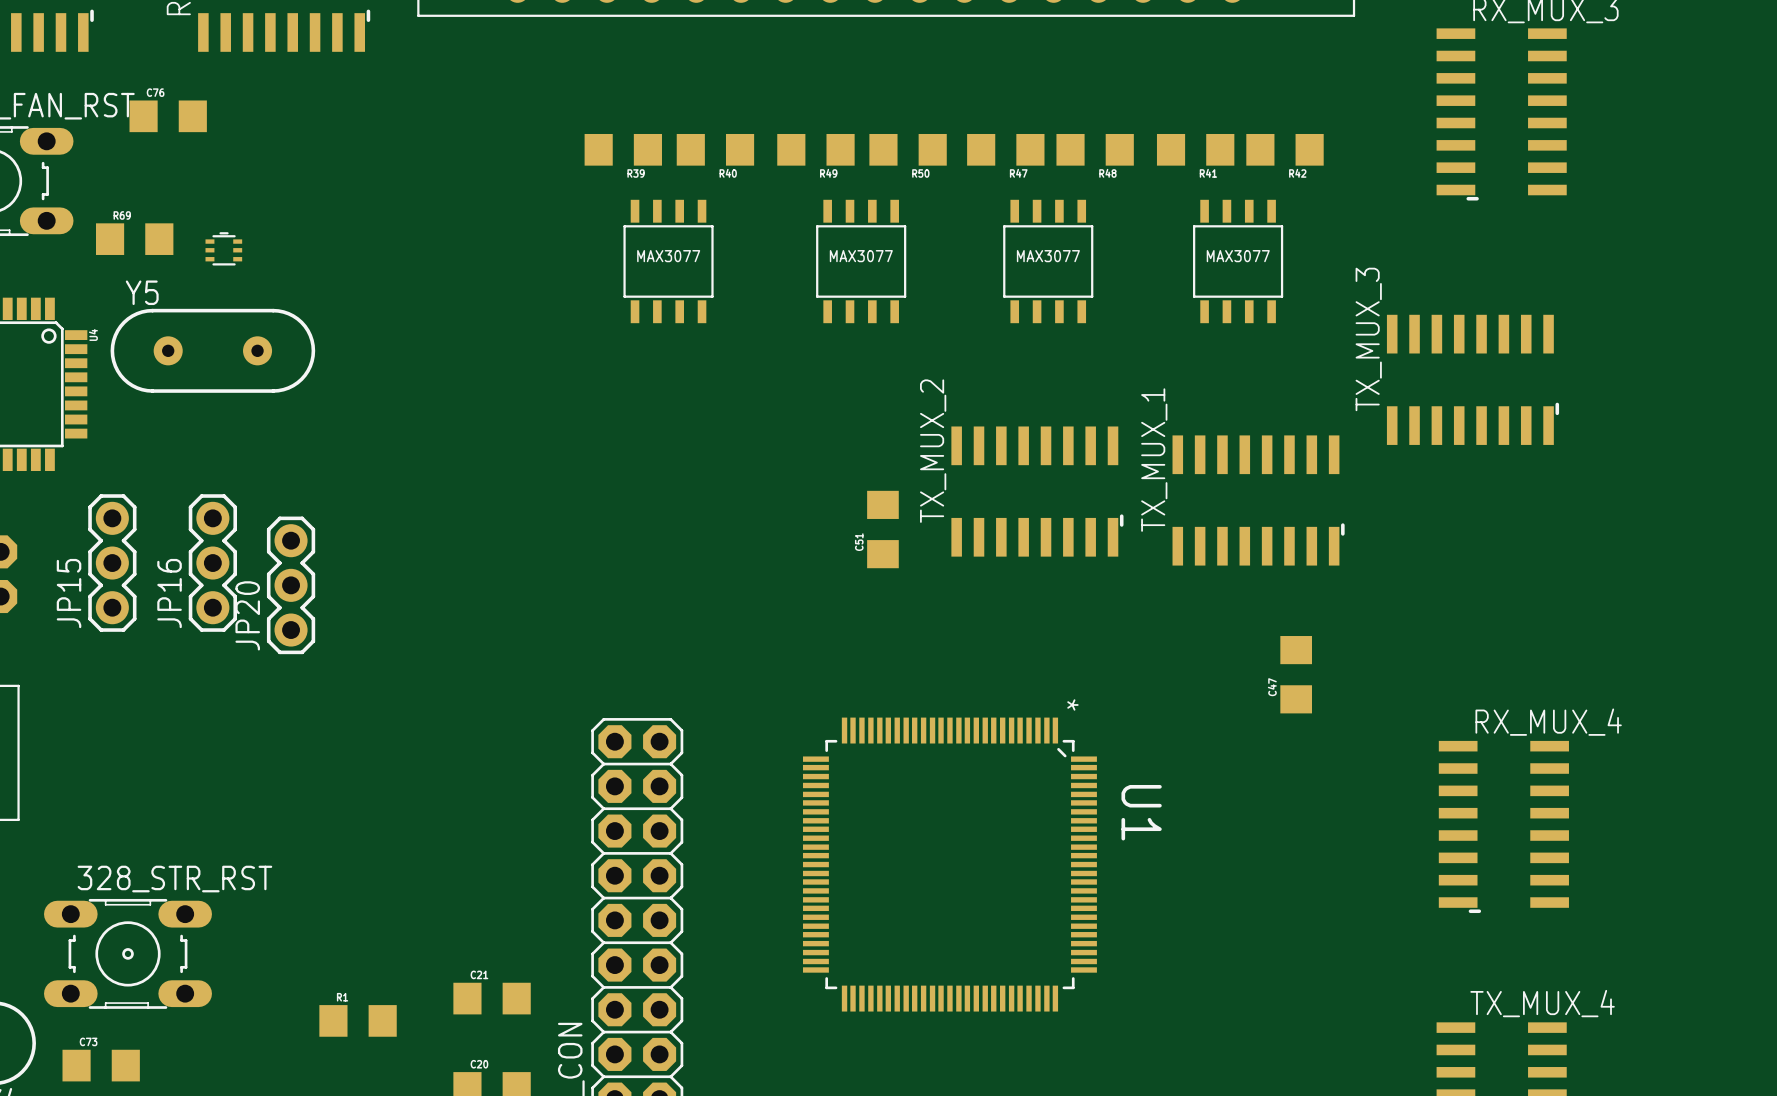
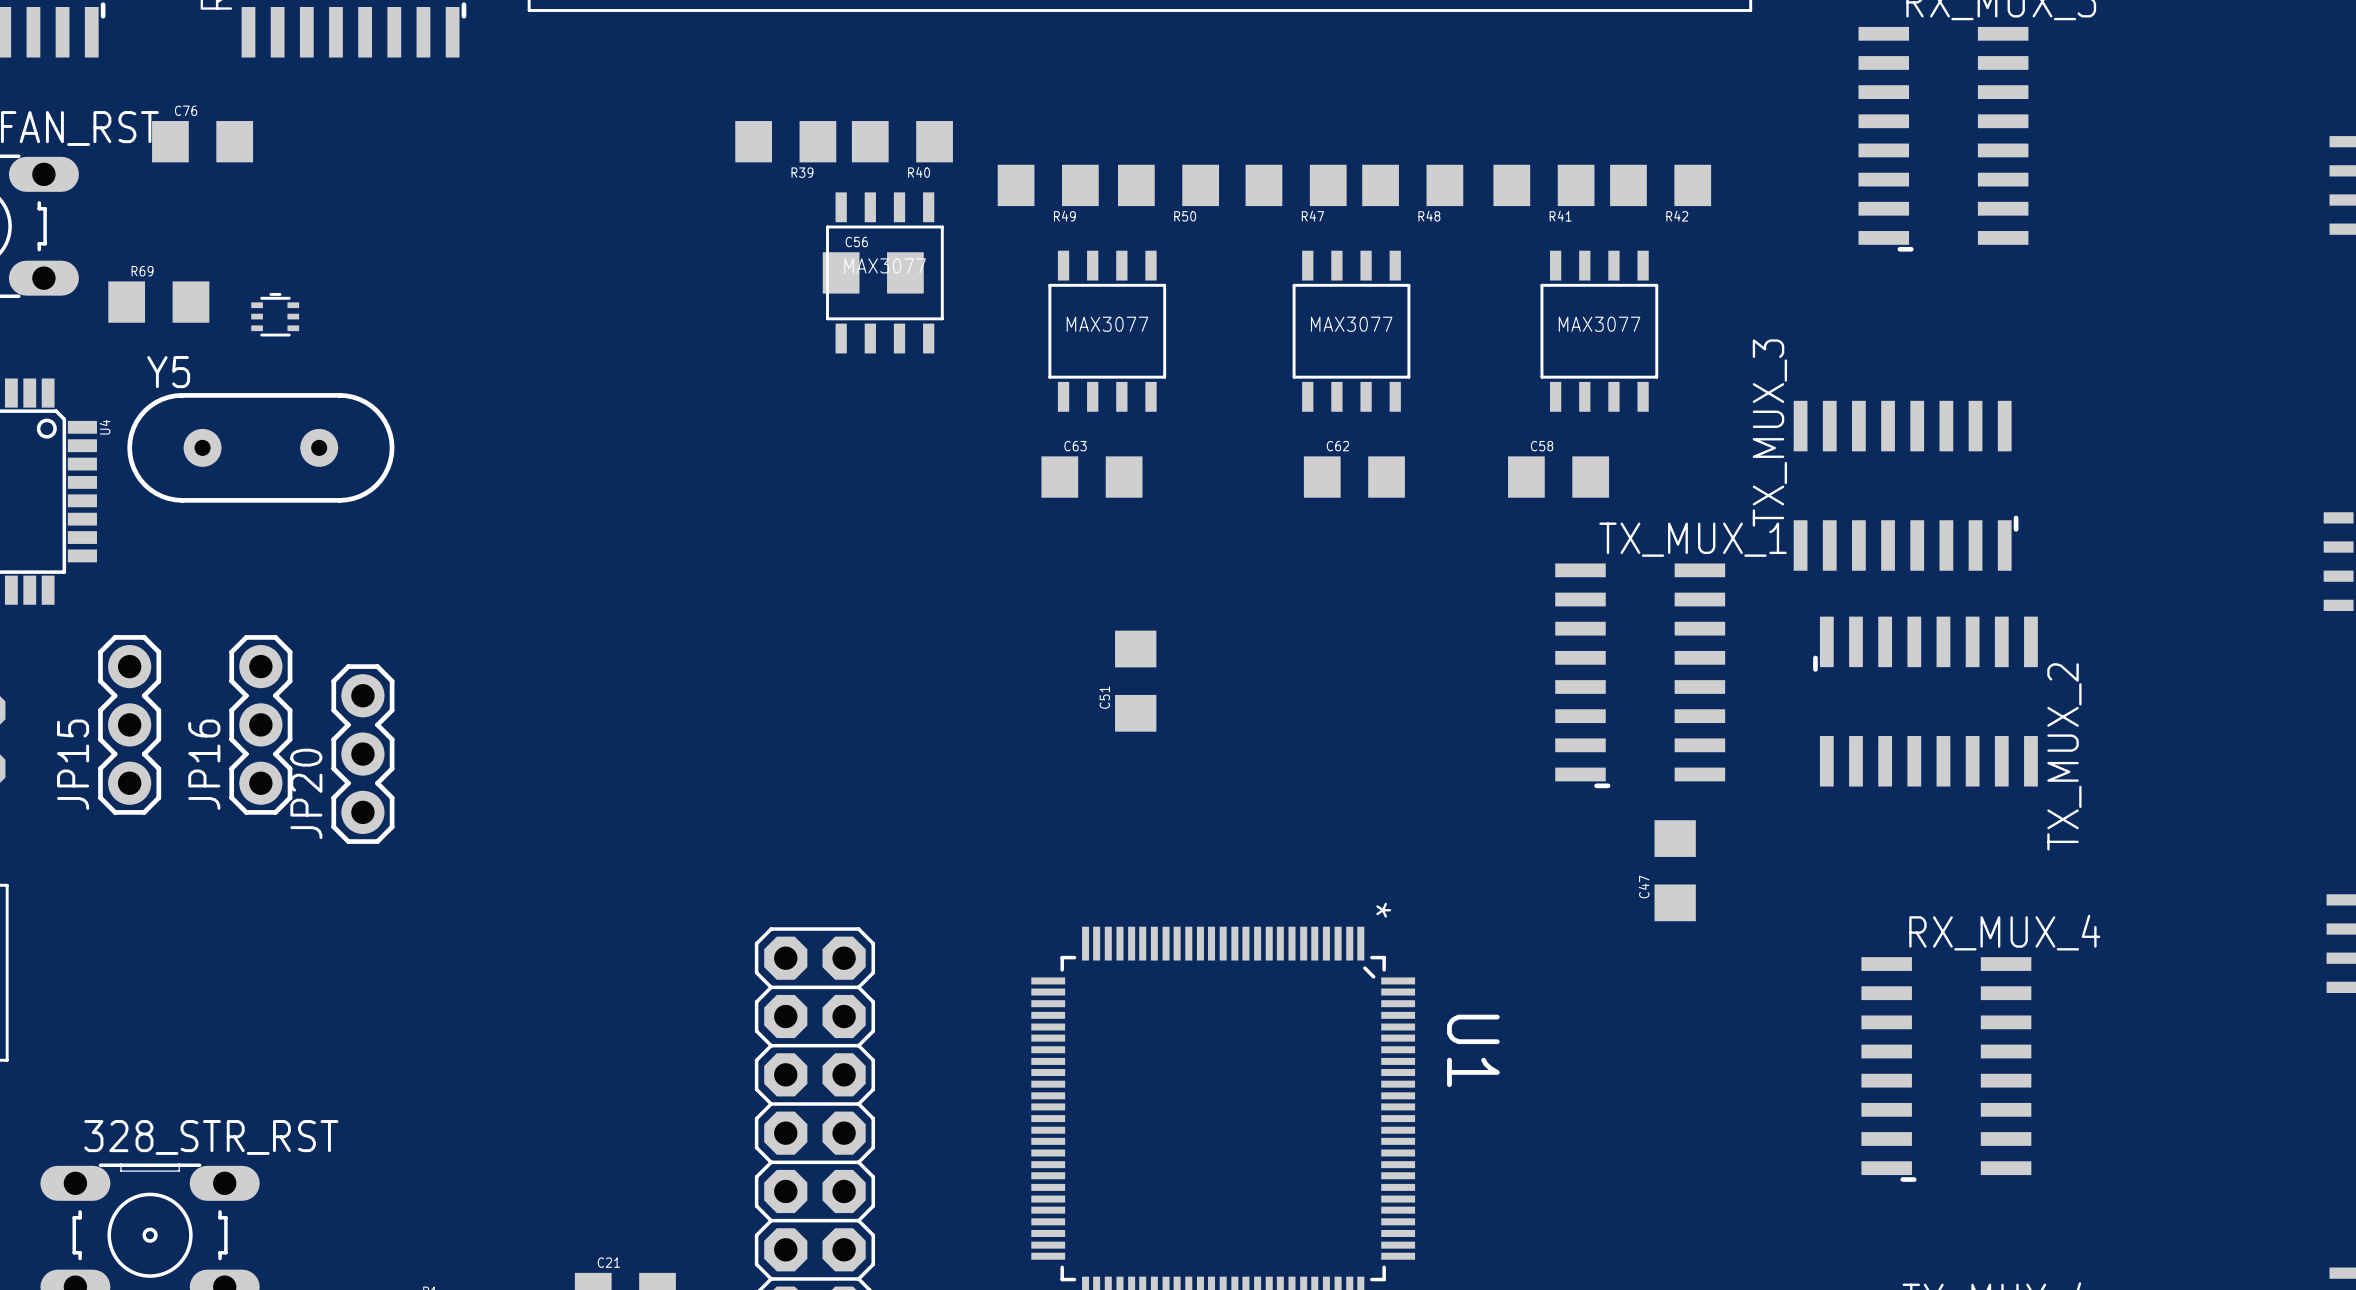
R39 position: (623, 149) -> (785, 141)
R40 position: (715, 149) -> (902, 141)
C56: none -> (873, 272)
part position: (668, 261) -> (884, 272)
C63: none -> (1091, 477)
C62: none -> (1354, 477)
C58: none -> (1558, 477)
TX_MUX_2 rotation: 0° (1037, 491) -> 180° (1925, 701)
TX_MUX_2 position: (1037, 491) -> (1925, 701)
TX_MUX_1 rotation: 0° (1258, 500) -> 90° clockwise (1640, 675)

